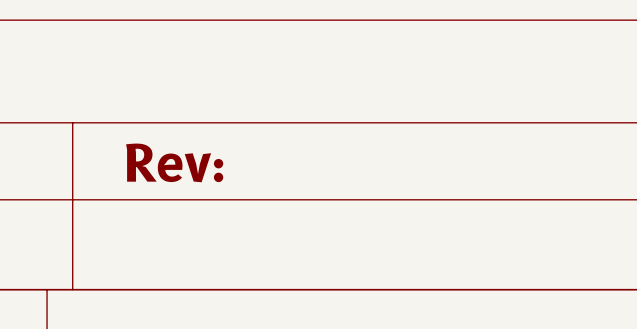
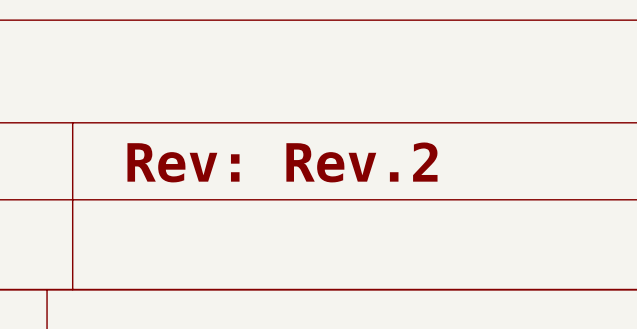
title block: Rev: (174, 162) -> Rev: Rev.2 (282, 162)

